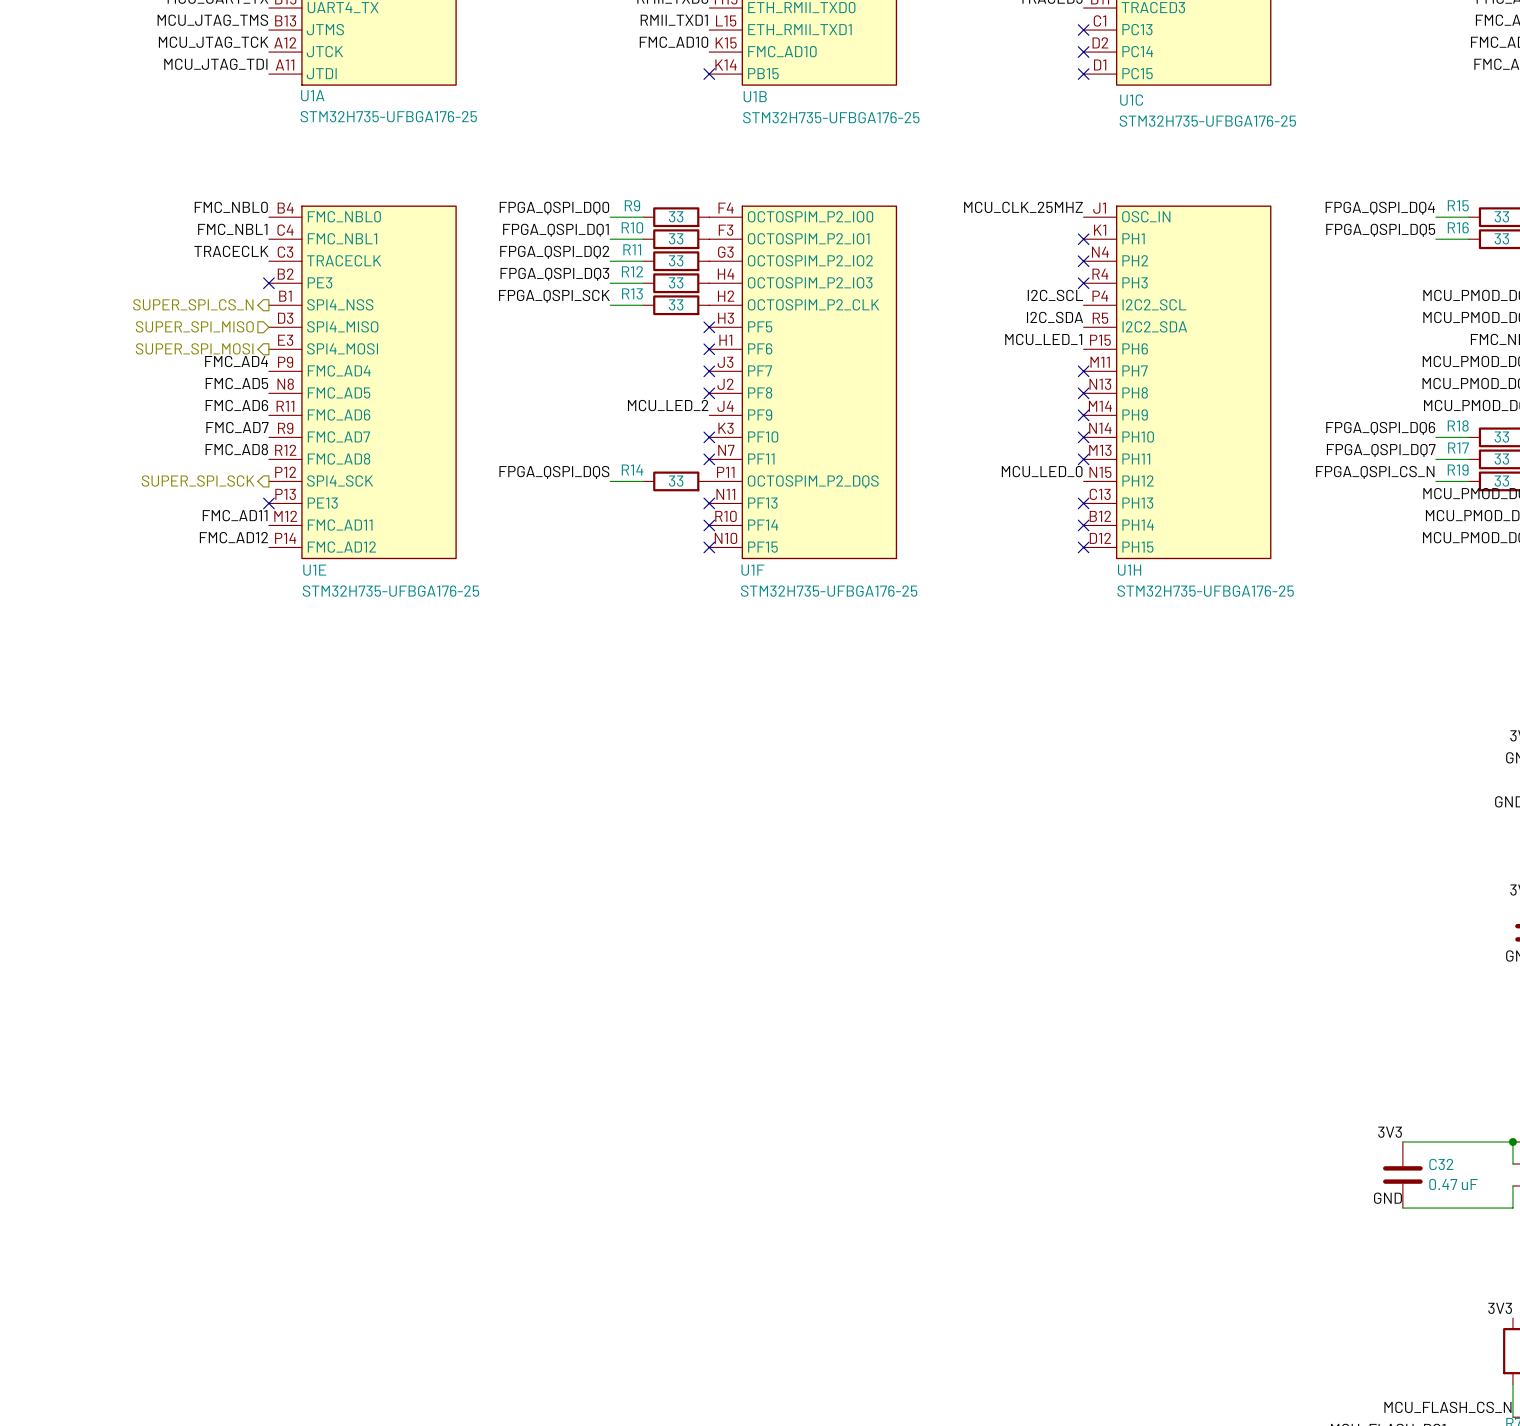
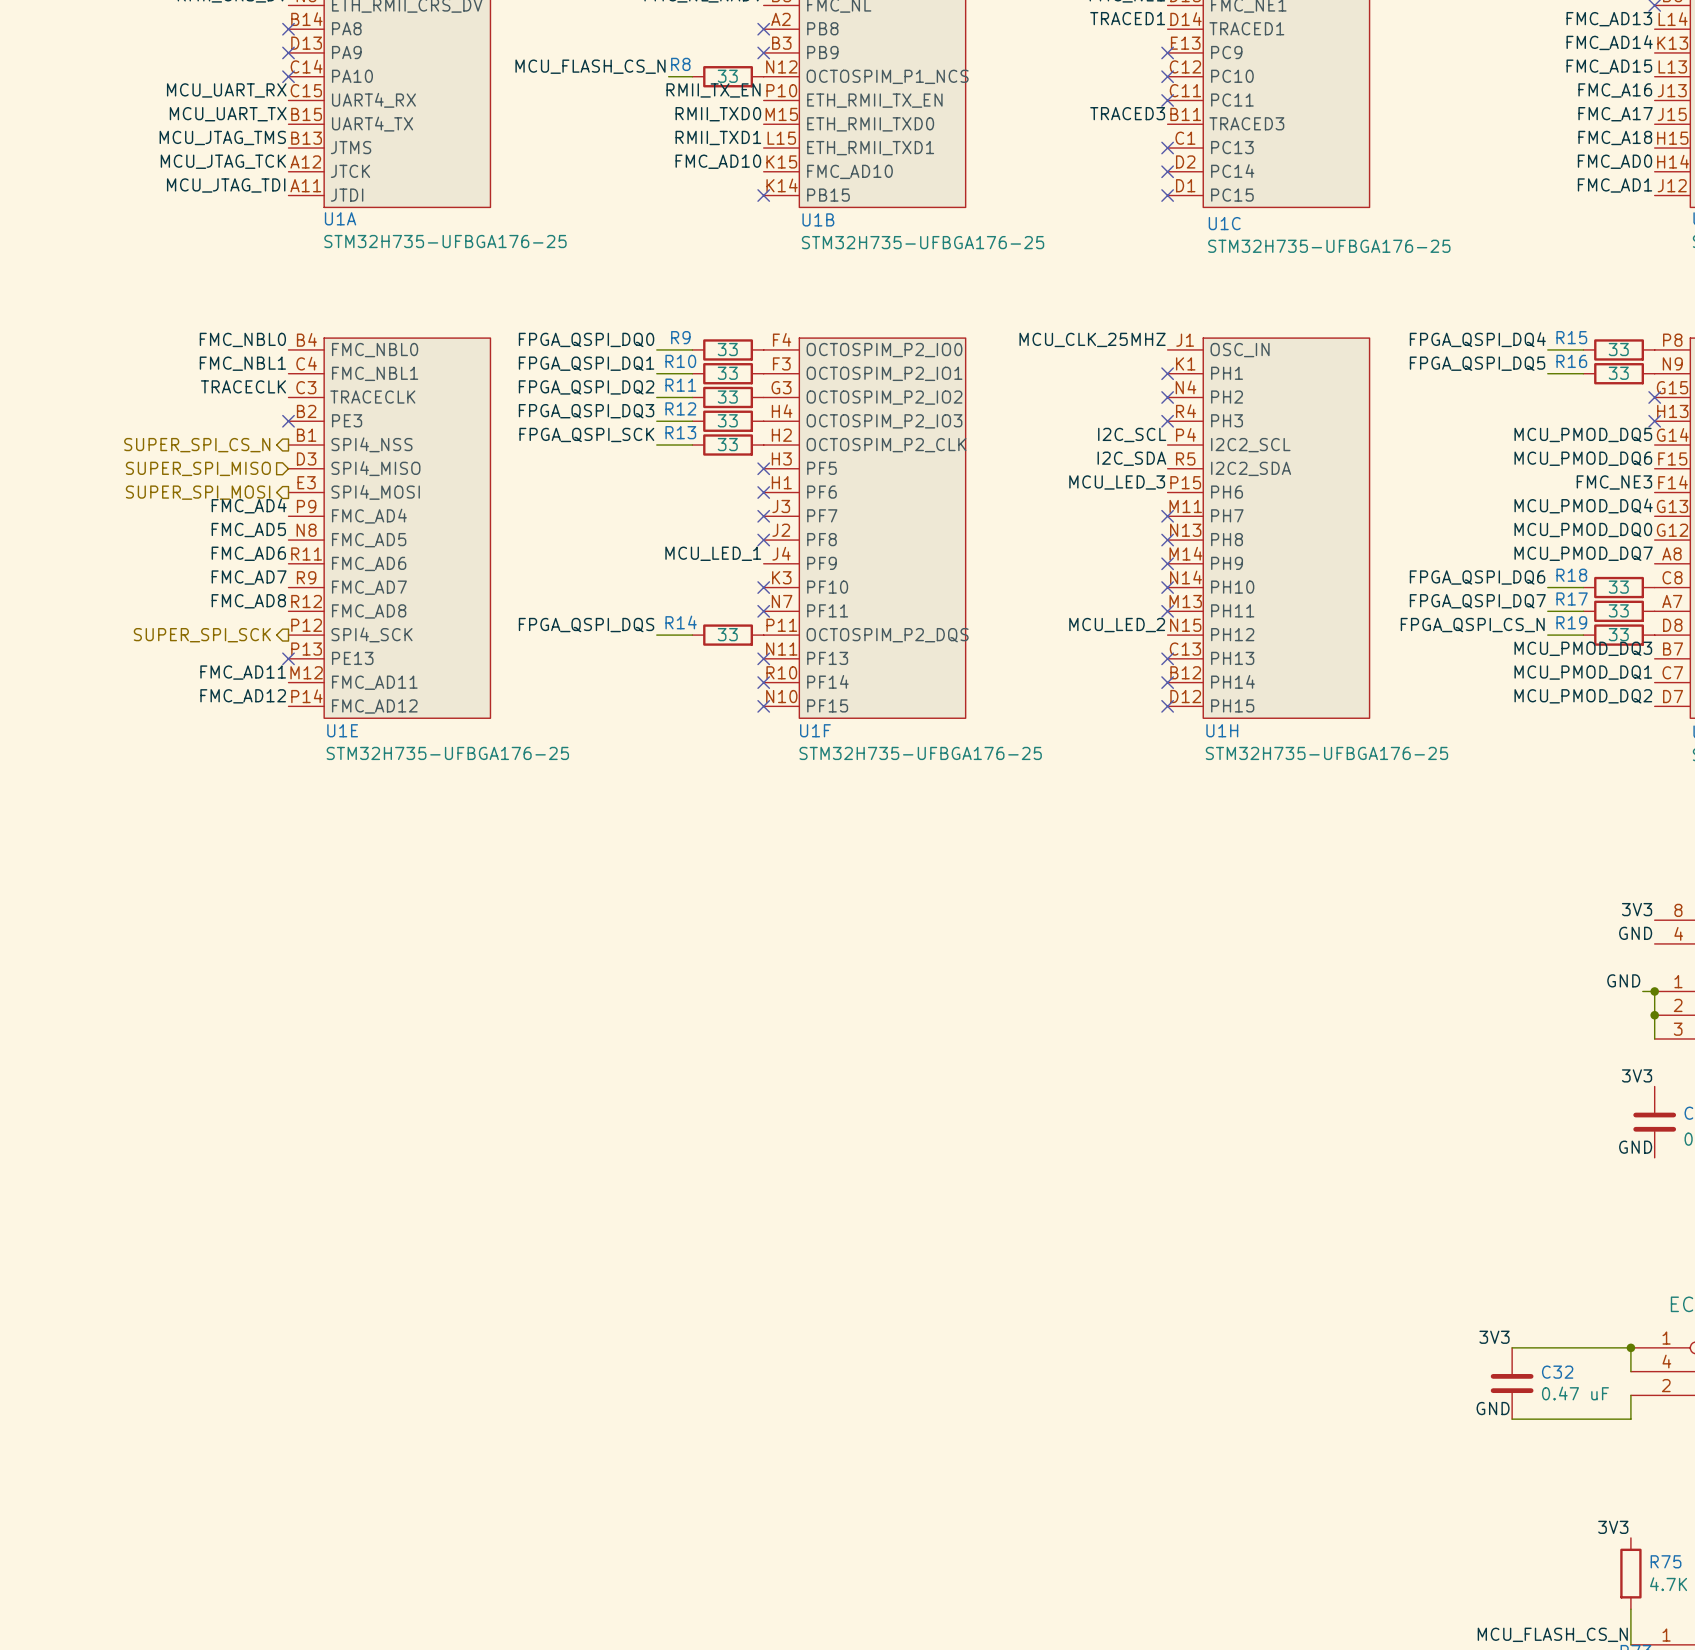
label: MCU_LED_1 (1043, 339) -> MCU_LED_3 (1117, 482)
label: MCU_LED_2 (668, 405) -> MCU_LED_1 (713, 553)
label: MCU_LED_0 (1042, 471) -> MCU_LED_2 (1117, 625)

